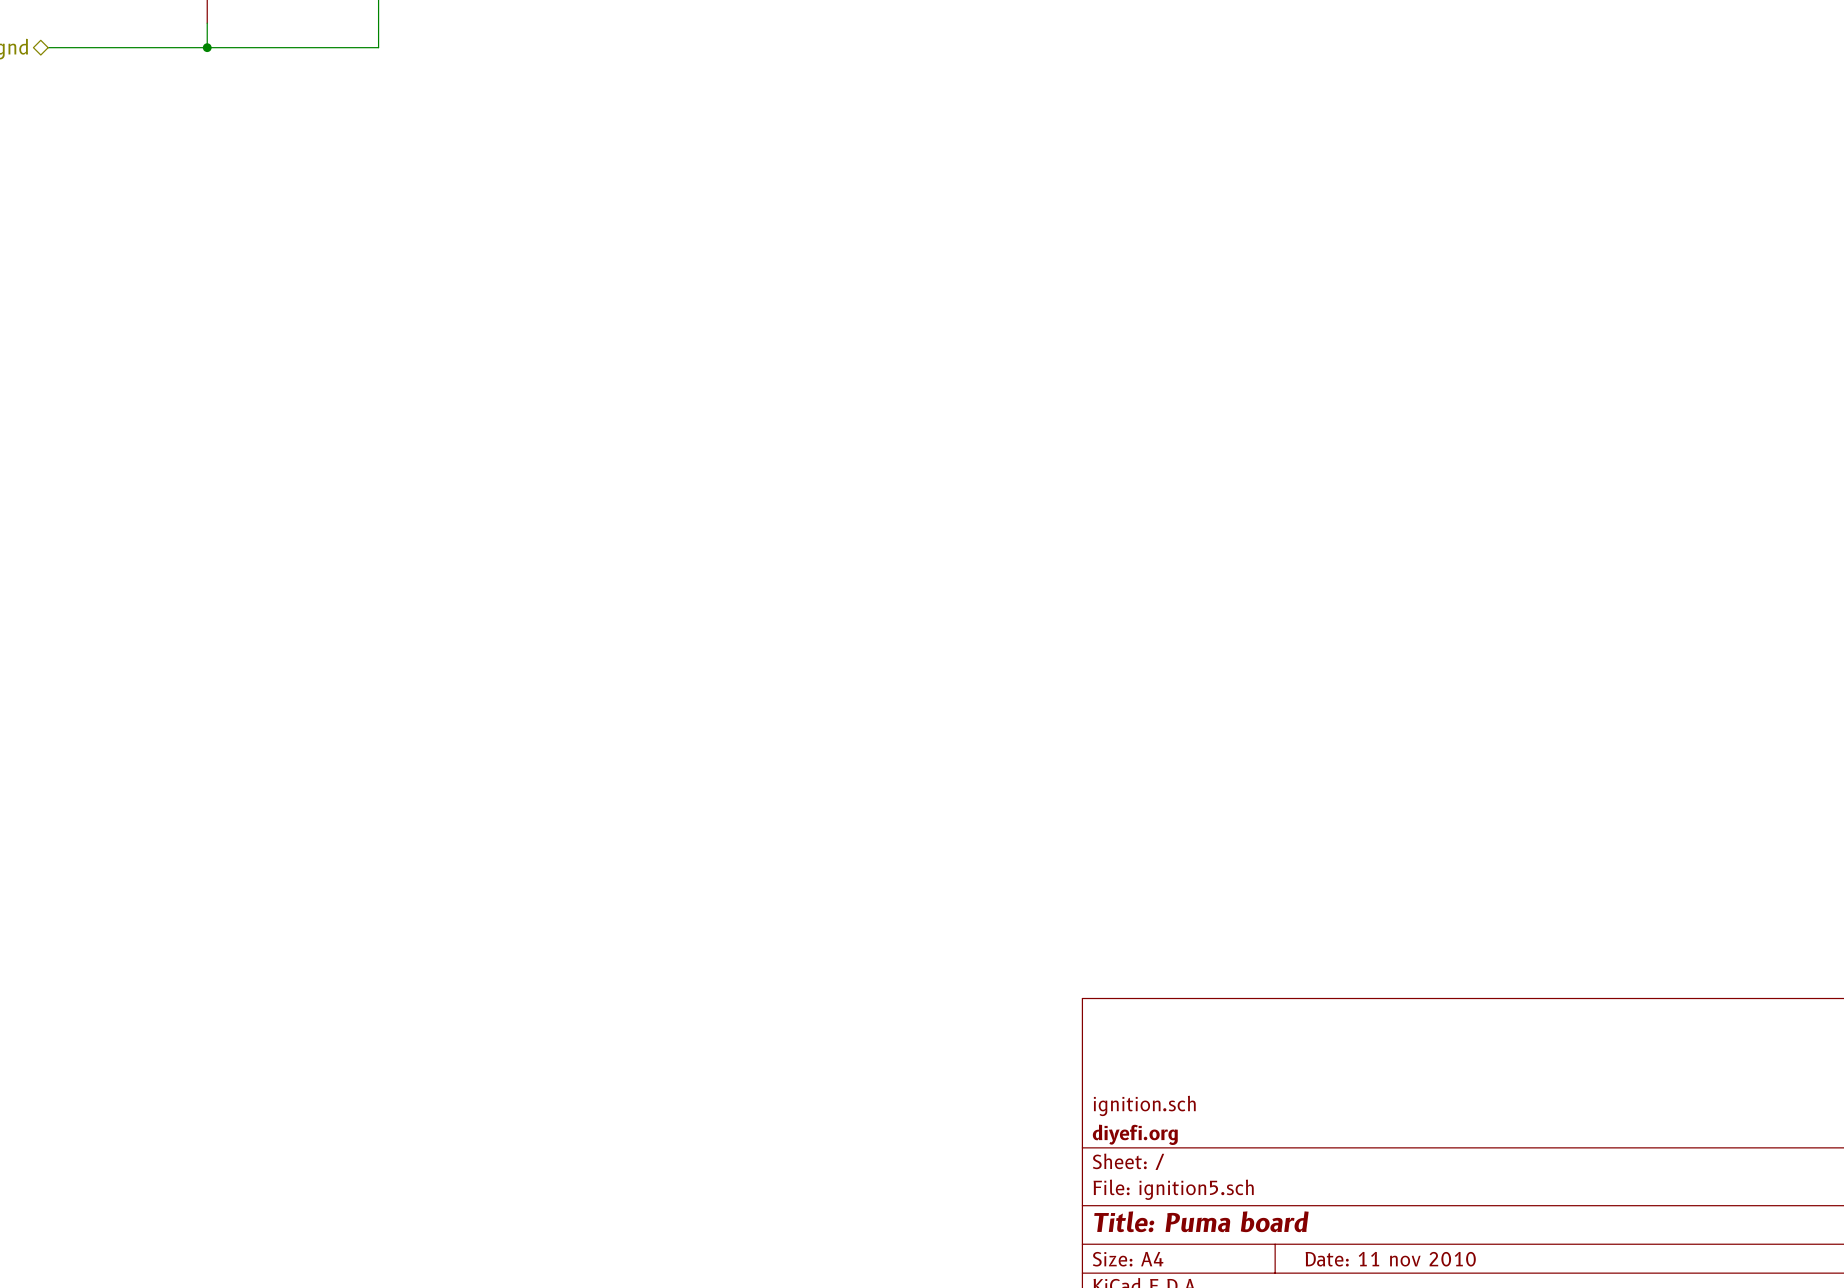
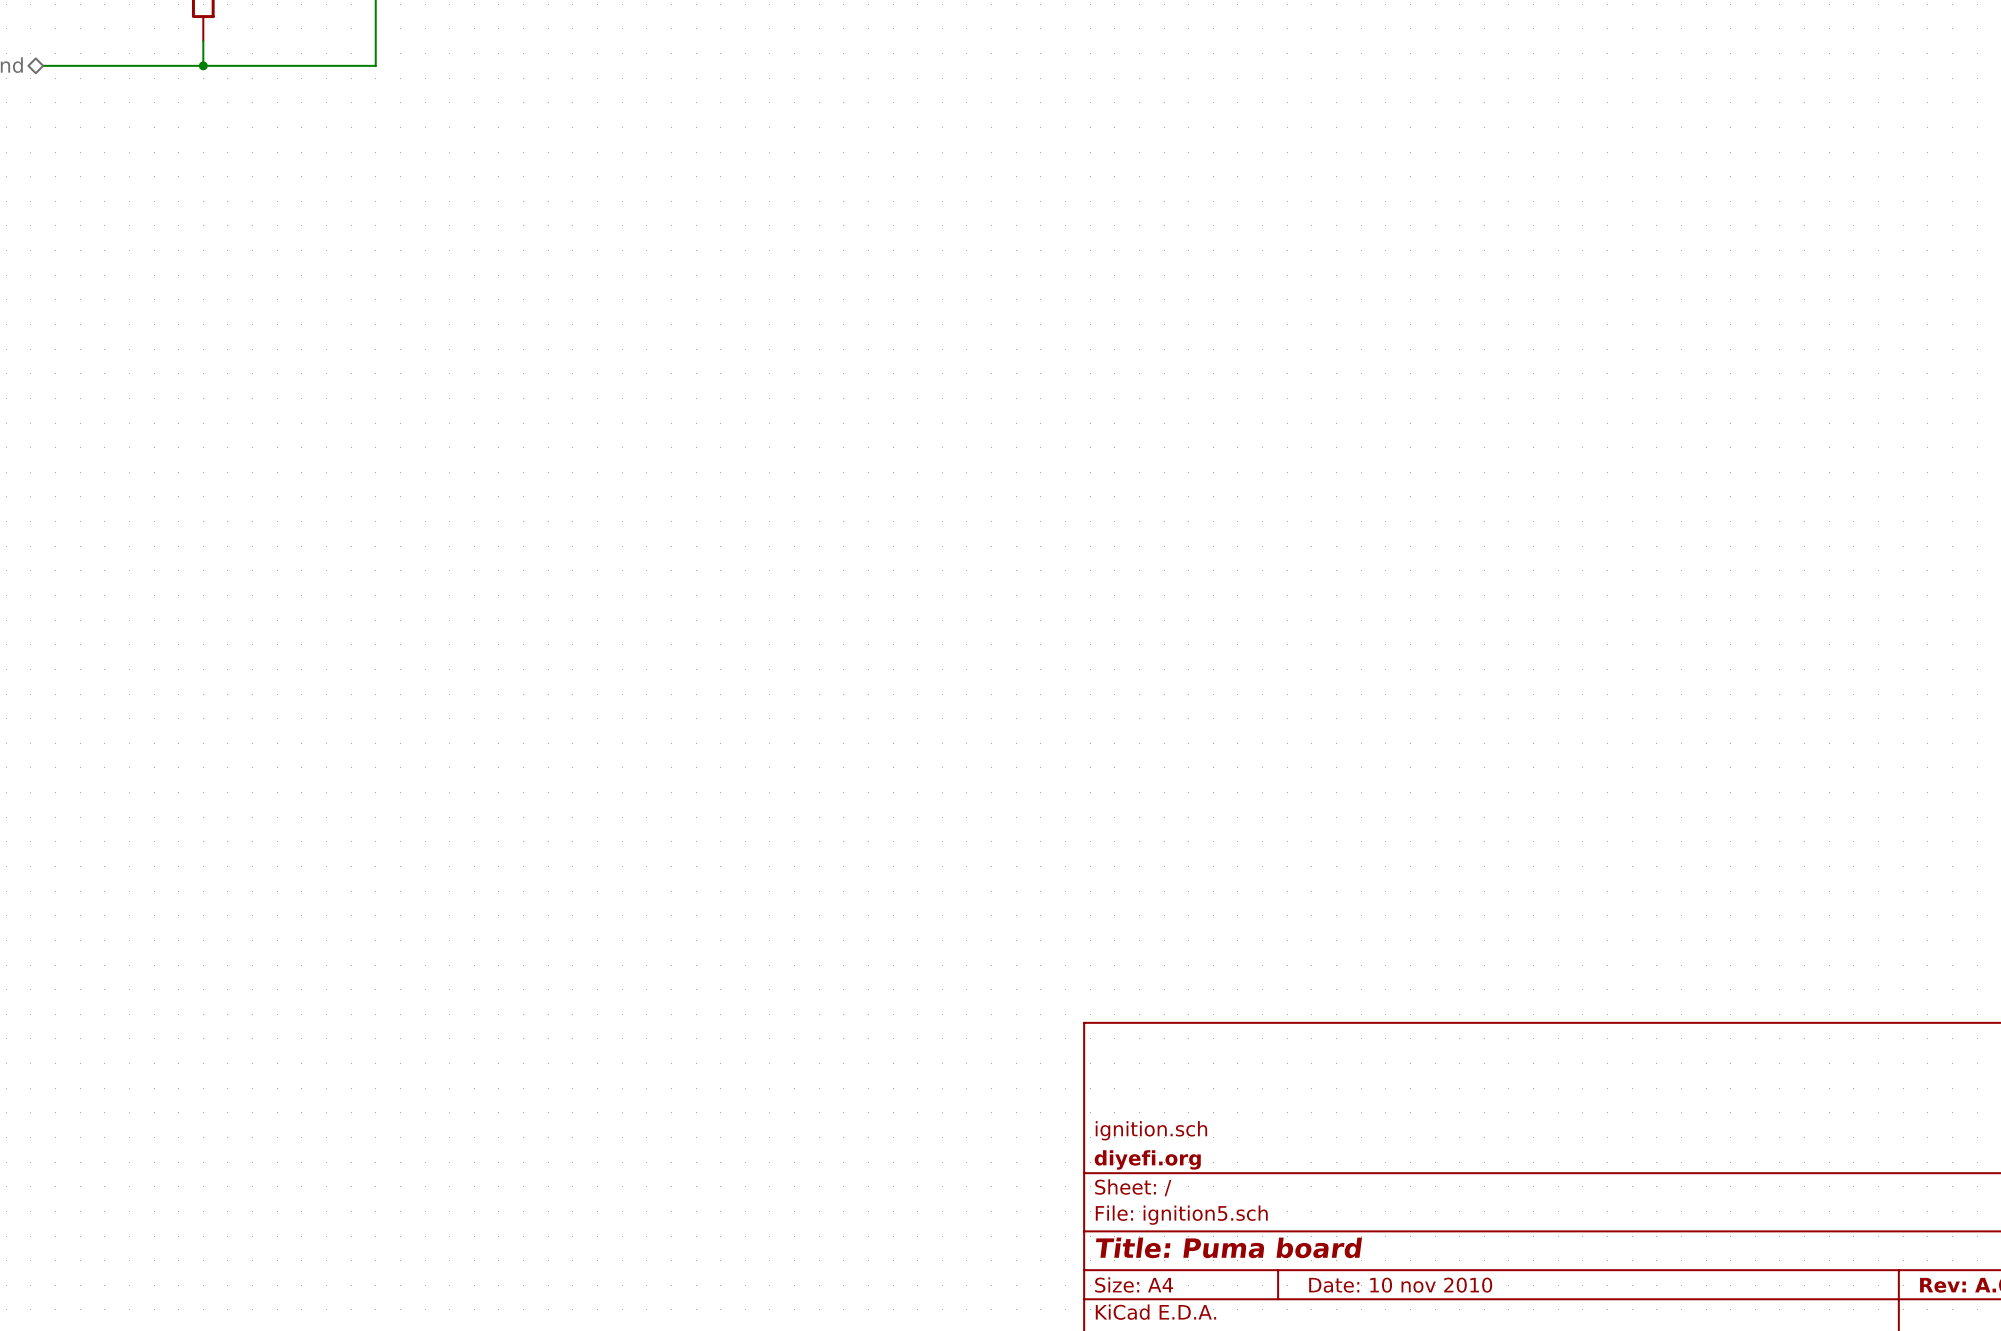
title block: Date: 11 nov 2010 (1390, 1259) -> Date: 10 nov 2010 (1400, 1285)

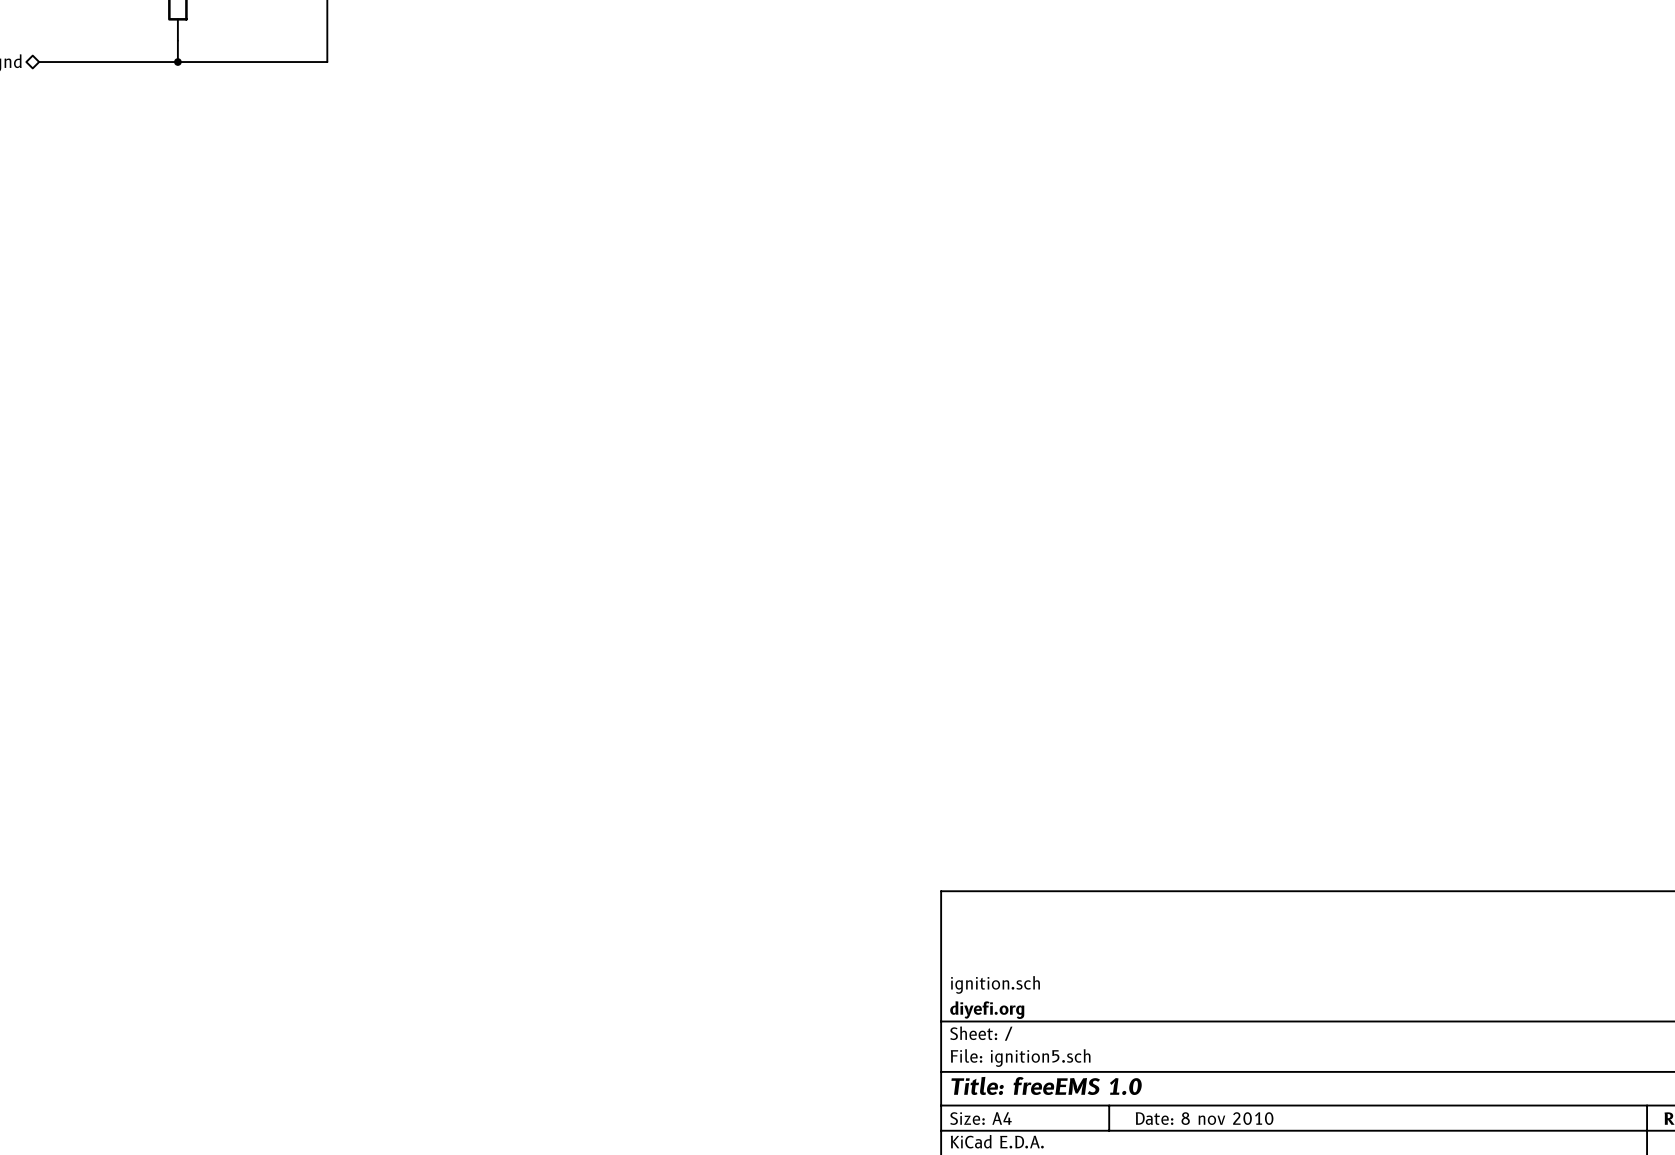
title block: Title: Puma board (1228, 1247) -> Title: freeEMS 1.0 (1046, 1085)
title block: Date: 10 nov 2010 (1400, 1285) -> Date: 8 nov 2010 (1204, 1118)

